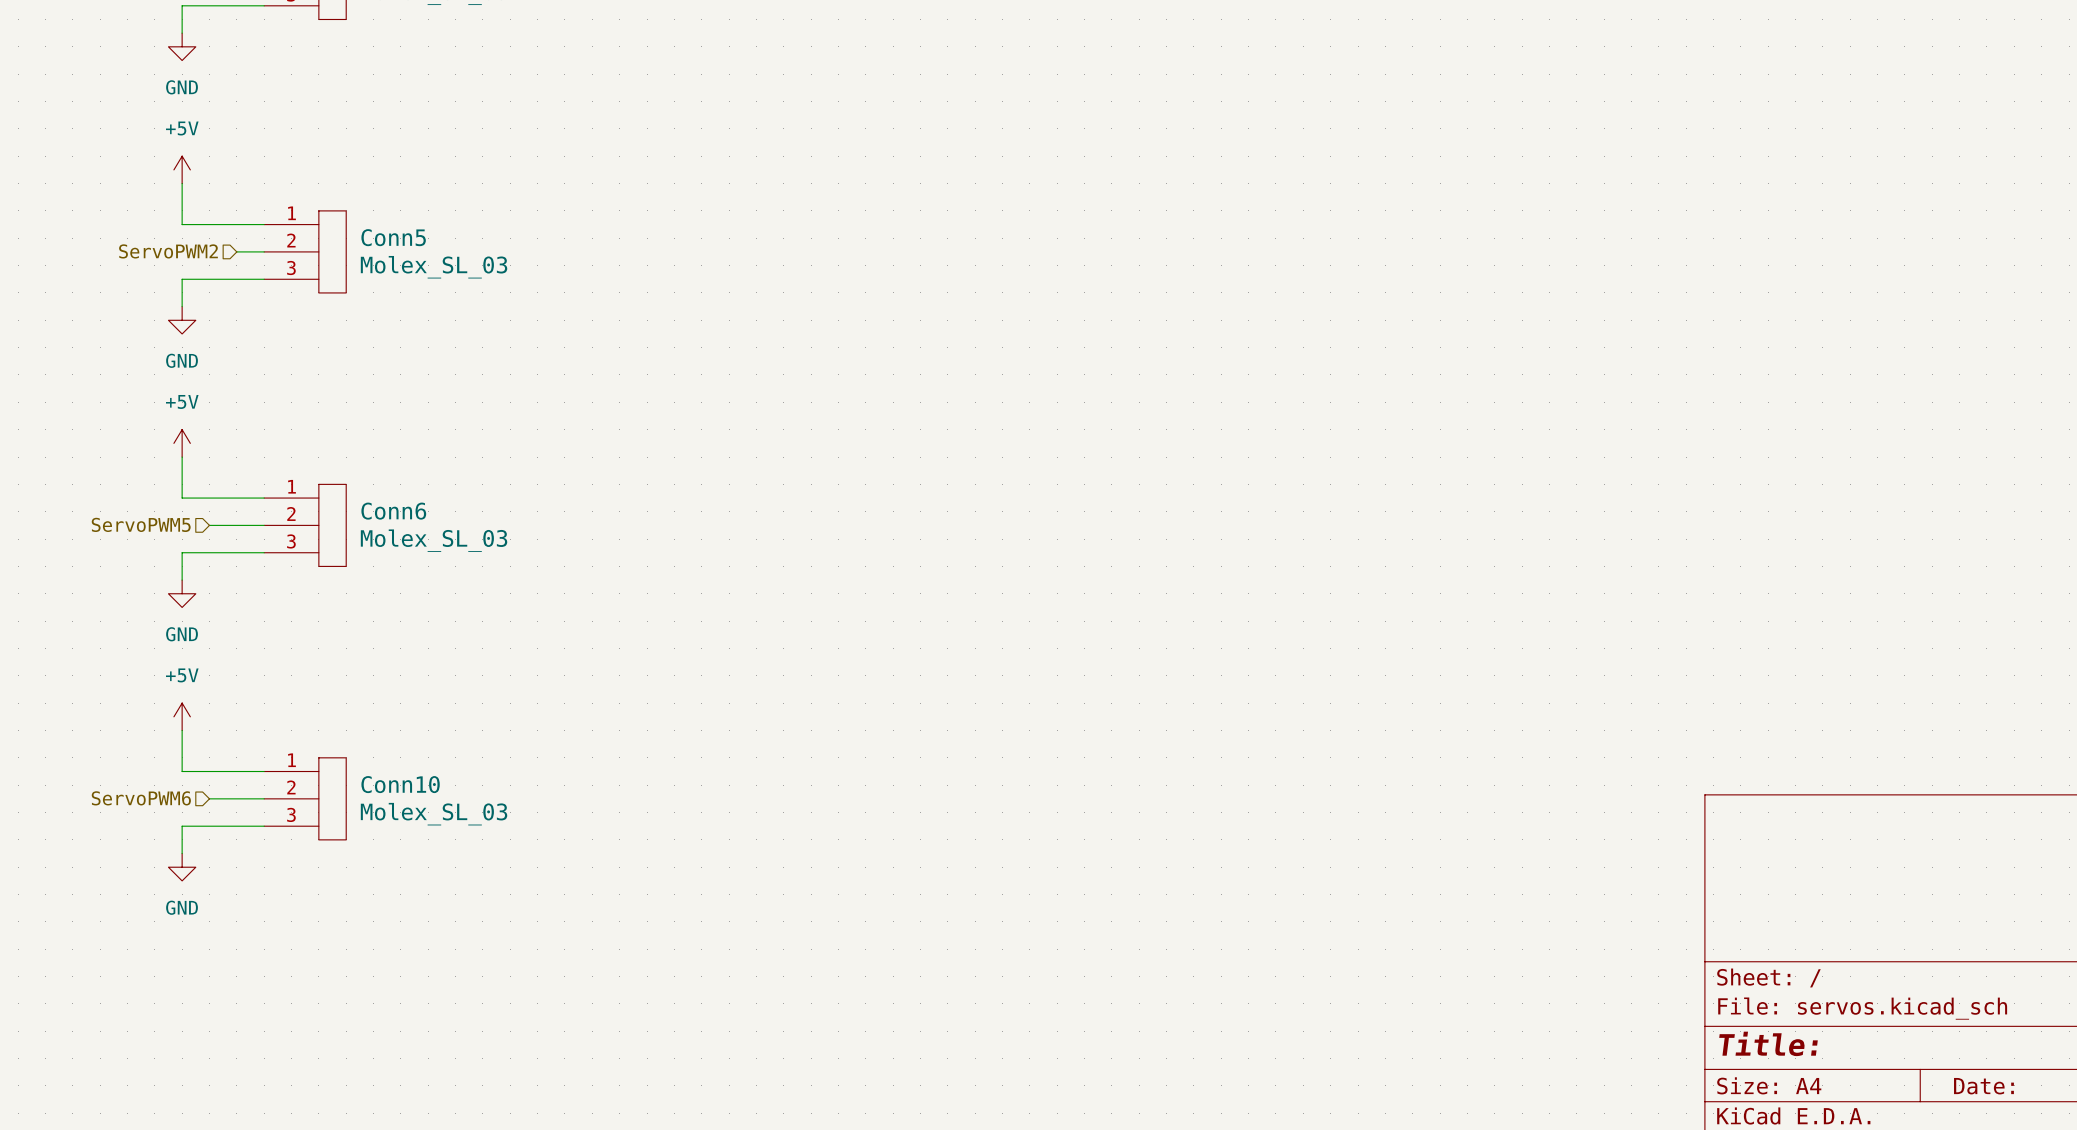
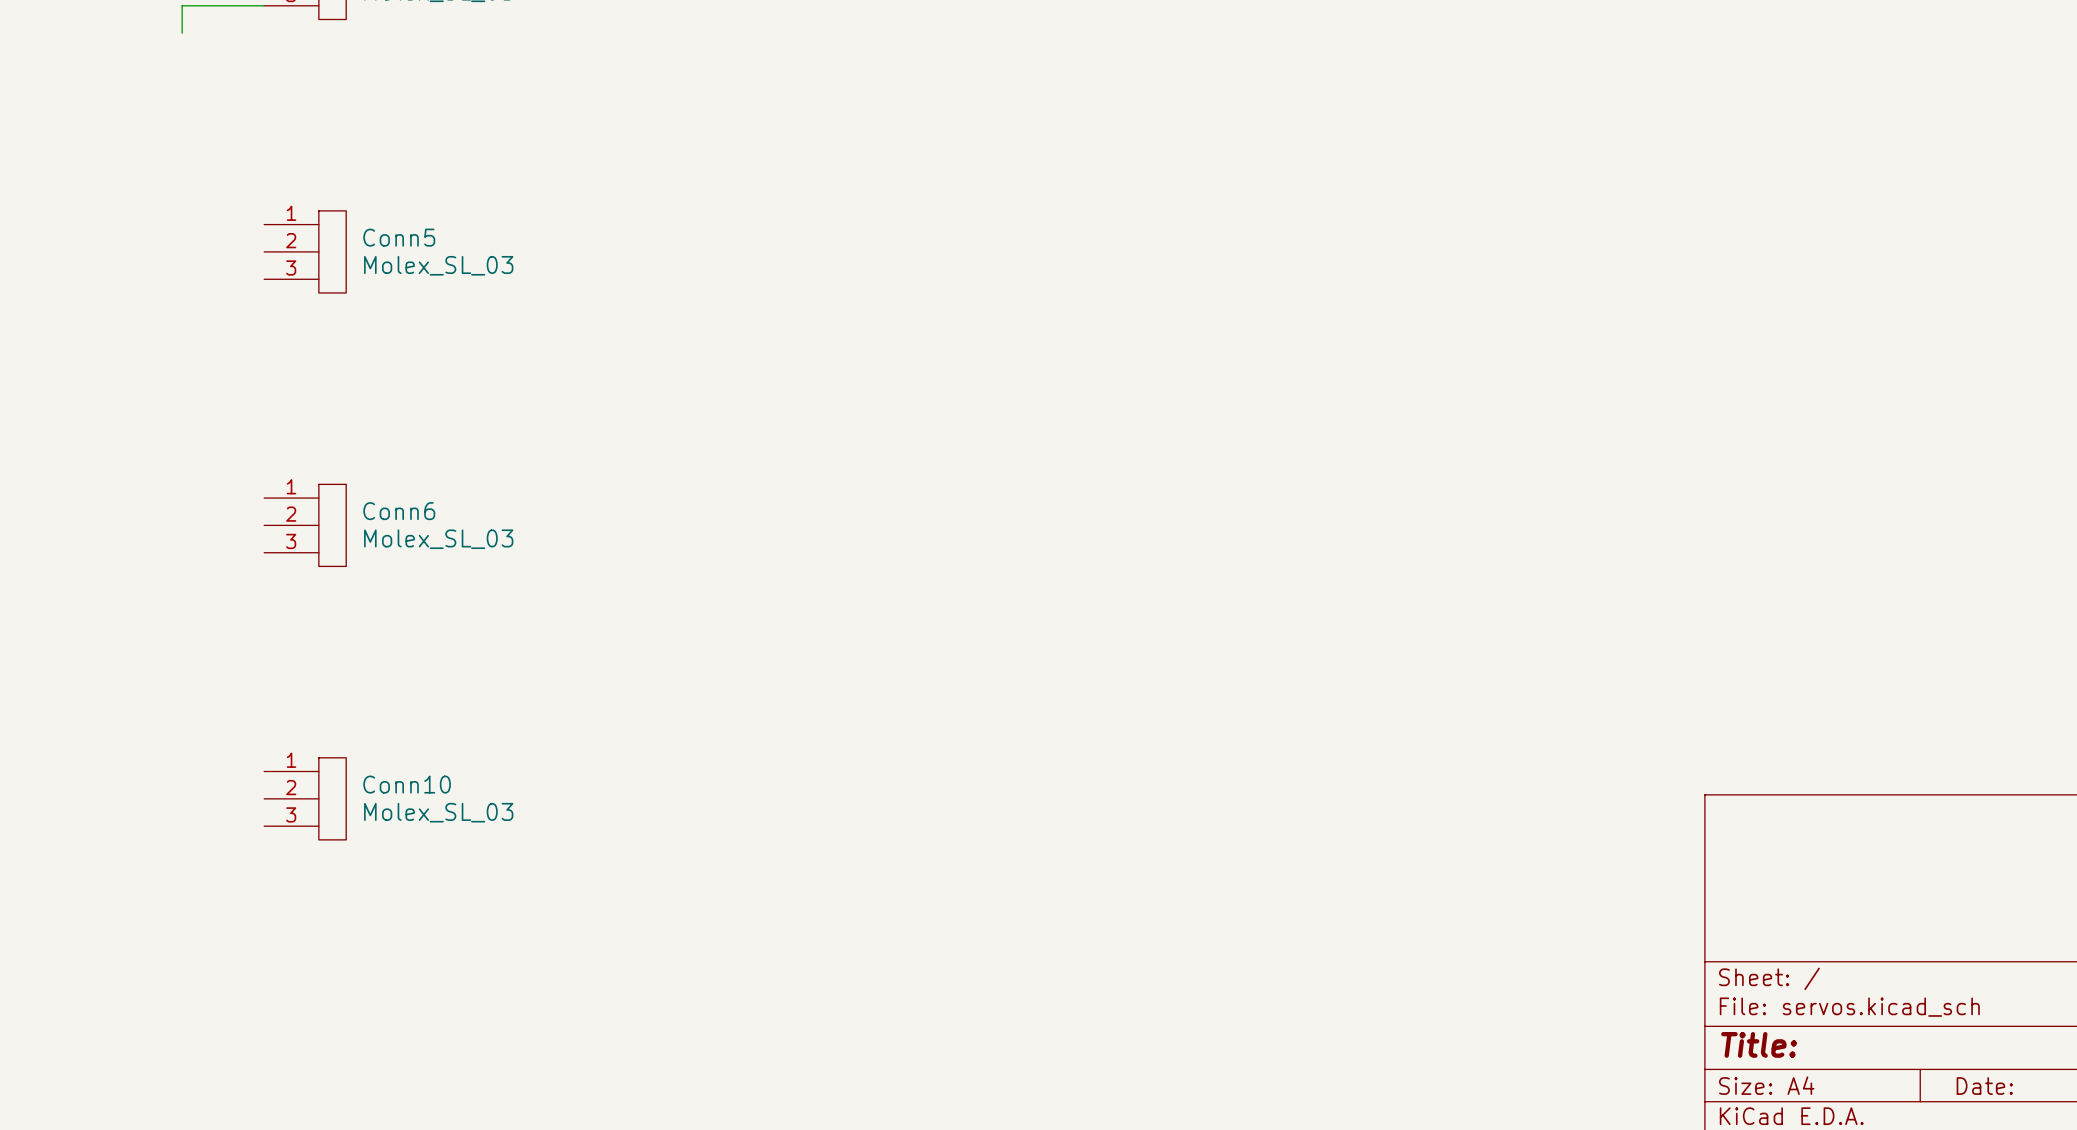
power symbol: GND (182, 46) -> none
power symbol: +5V (182, 169) -> none
wire: (182, 183) (182, 224) (264, 224) -> none
hierarchical label: ServoPWM2 (168, 251) -> none
wire: (236, 251) (264, 251) -> none
wire: (264, 279) (182, 279) (182, 306) -> none
power symbol: GND (182, 320) -> none
power symbol: +5V (182, 443) -> none
wire: (182, 457) (182, 498) (264, 498) -> none
hierarchical label: ServoPWM5 (141, 524) -> none
wire: (209, 525) (264, 525) -> none
wire: (264, 552) (182, 552) (182, 580) -> none
power symbol: GND (182, 593) -> none
power symbol: +5V (182, 716) -> none
wire: (182, 730) (182, 771) (264, 771) -> none
hierarchical label: ServoPWM6 (141, 798) -> none
wire: (209, 798) (264, 798) -> none
wire: (264, 826) (182, 826) (182, 853) -> none
power symbol: GND (182, 867) -> none

